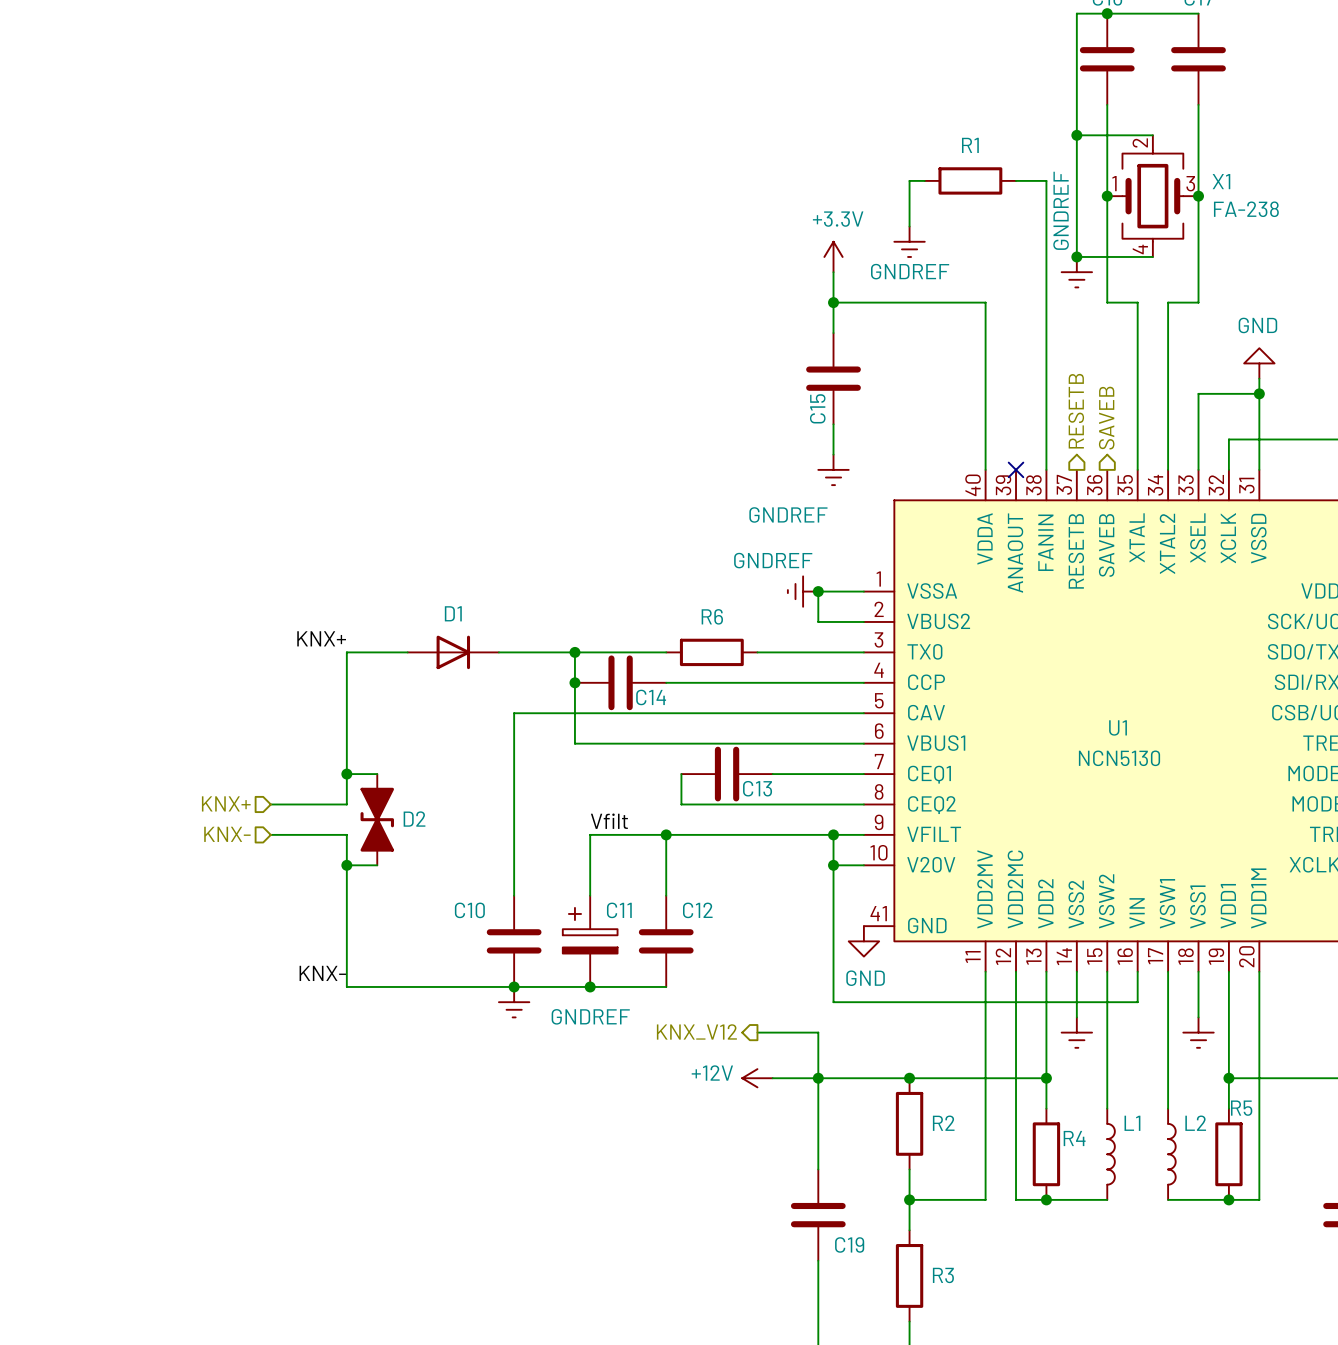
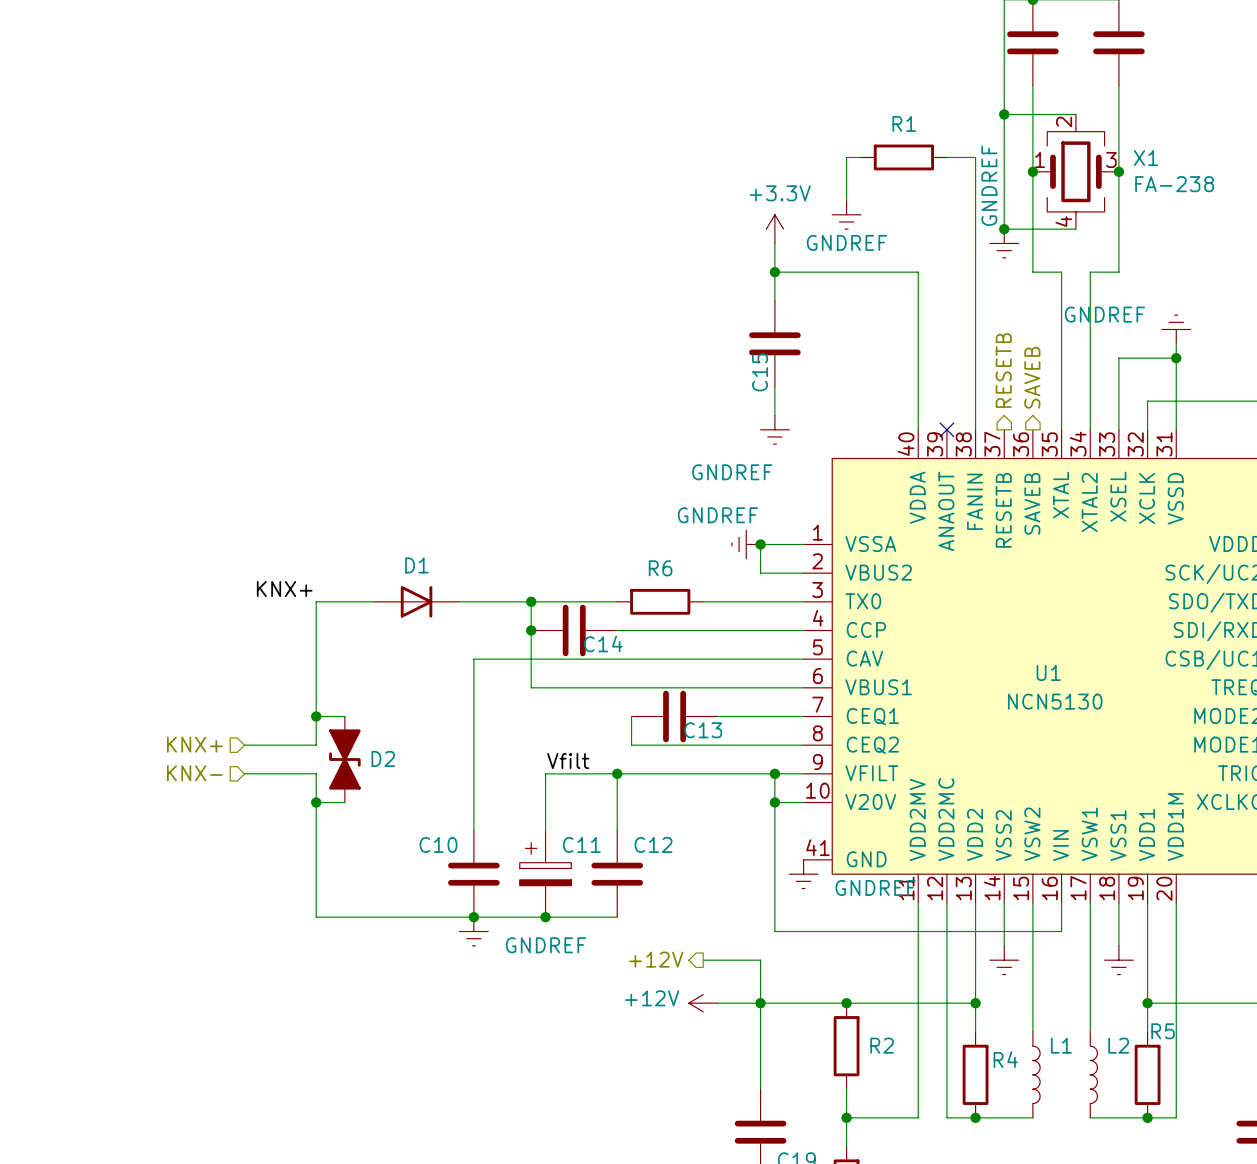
power symbol: GND (1259, 363) -> GNDREF (1176, 329)
power symbol: GND (863, 941) -> GNDREF (803, 874)
label: KNX- (322, 973) -> none
hierarchical label: KNX_V12 (696, 1031) -> +12V (656, 959)

